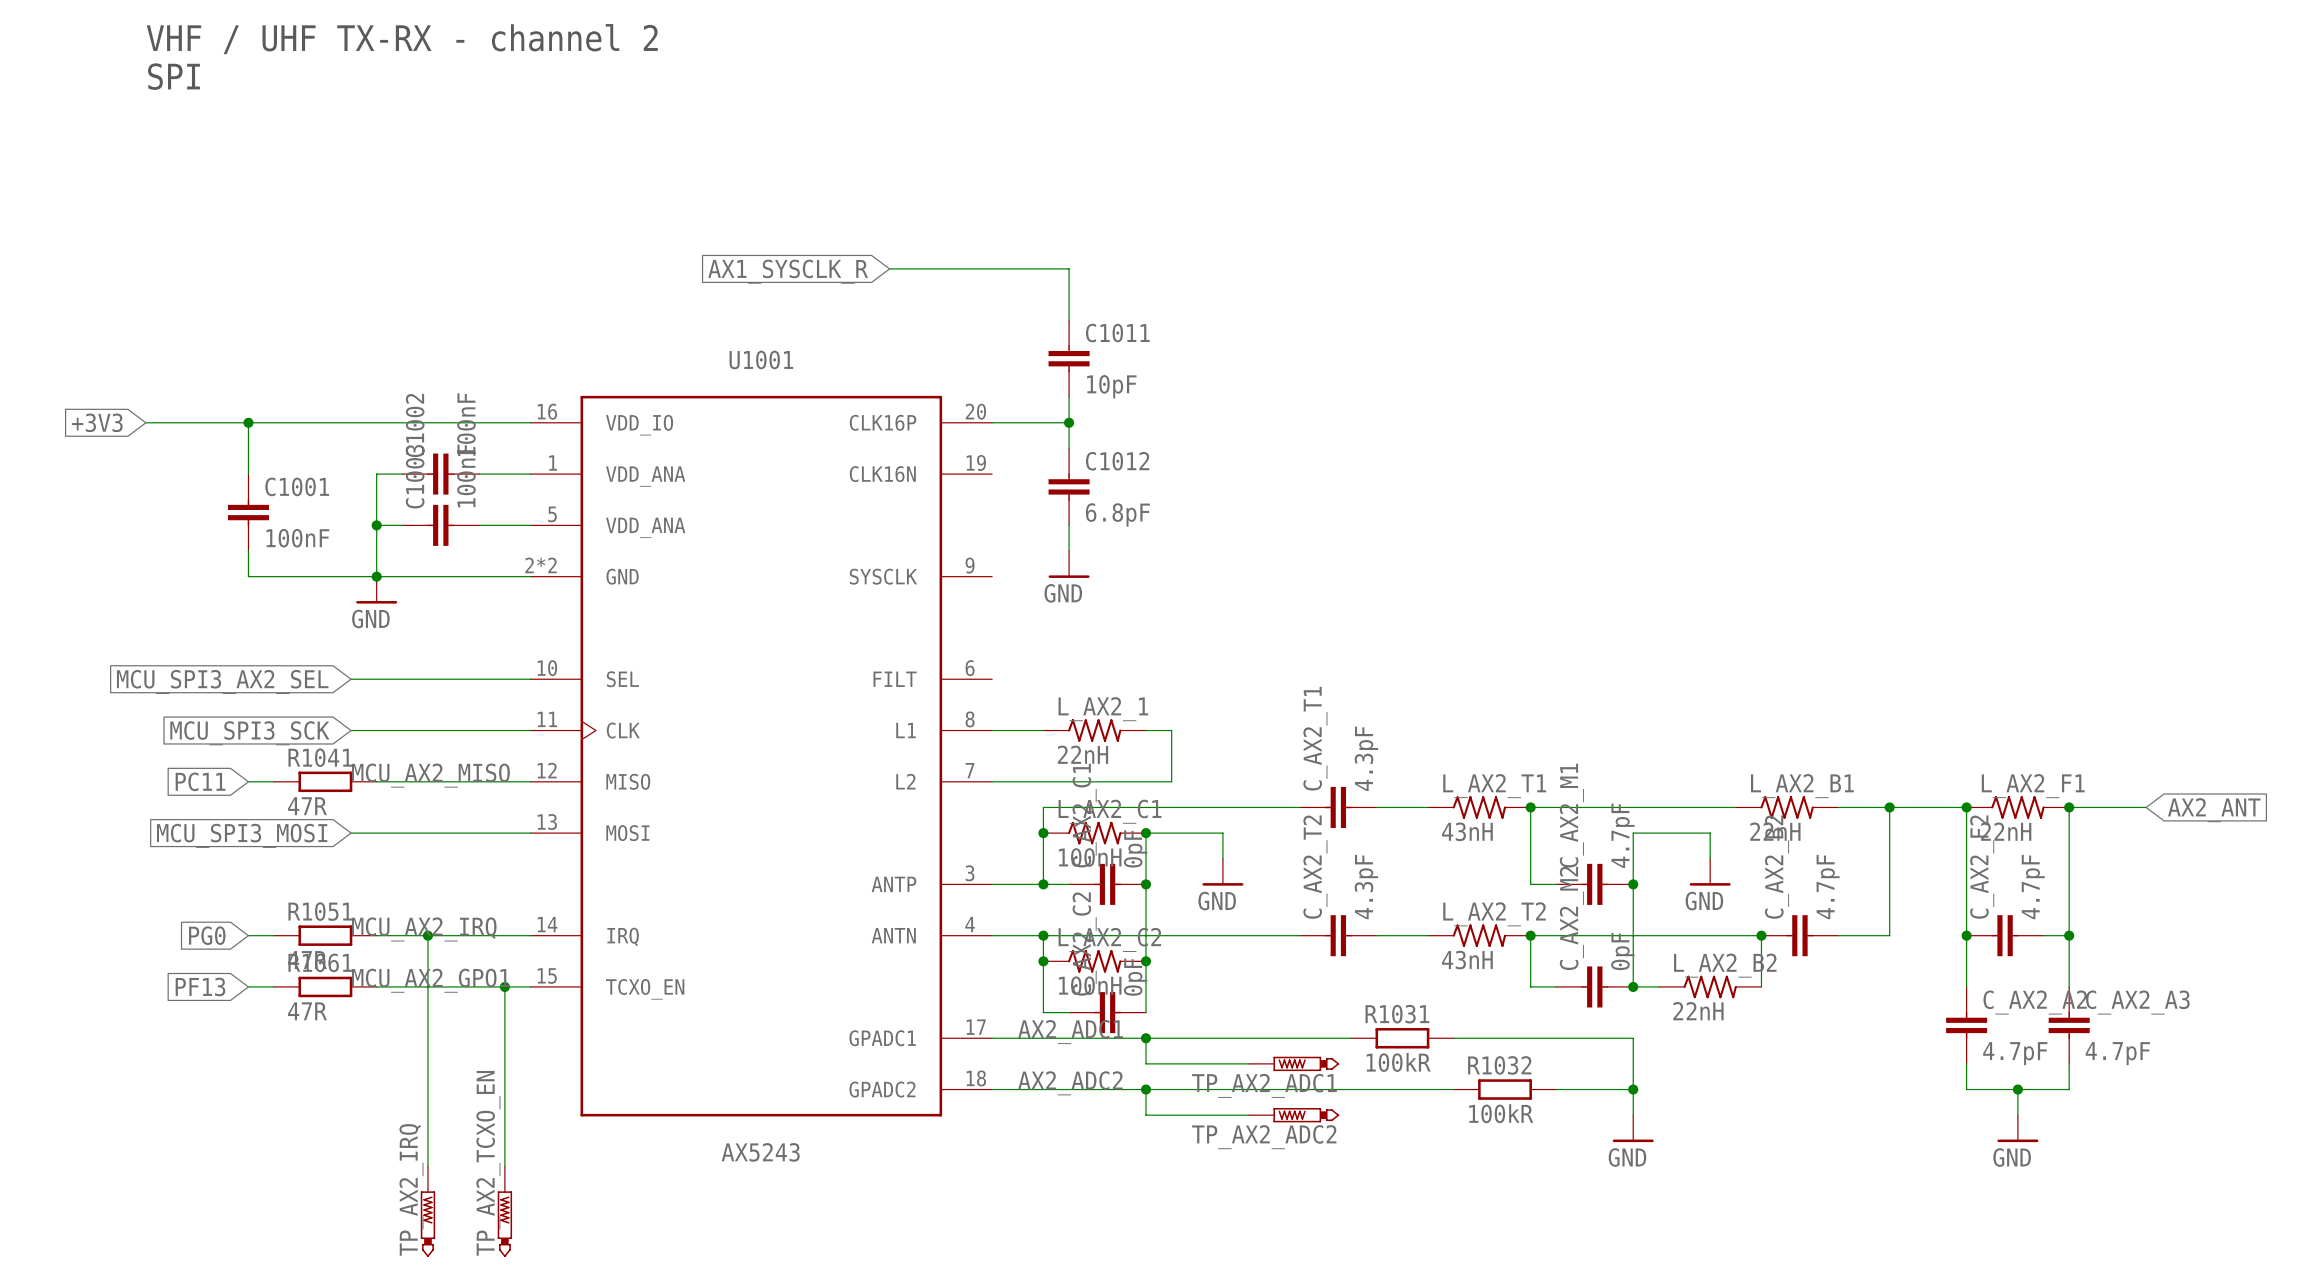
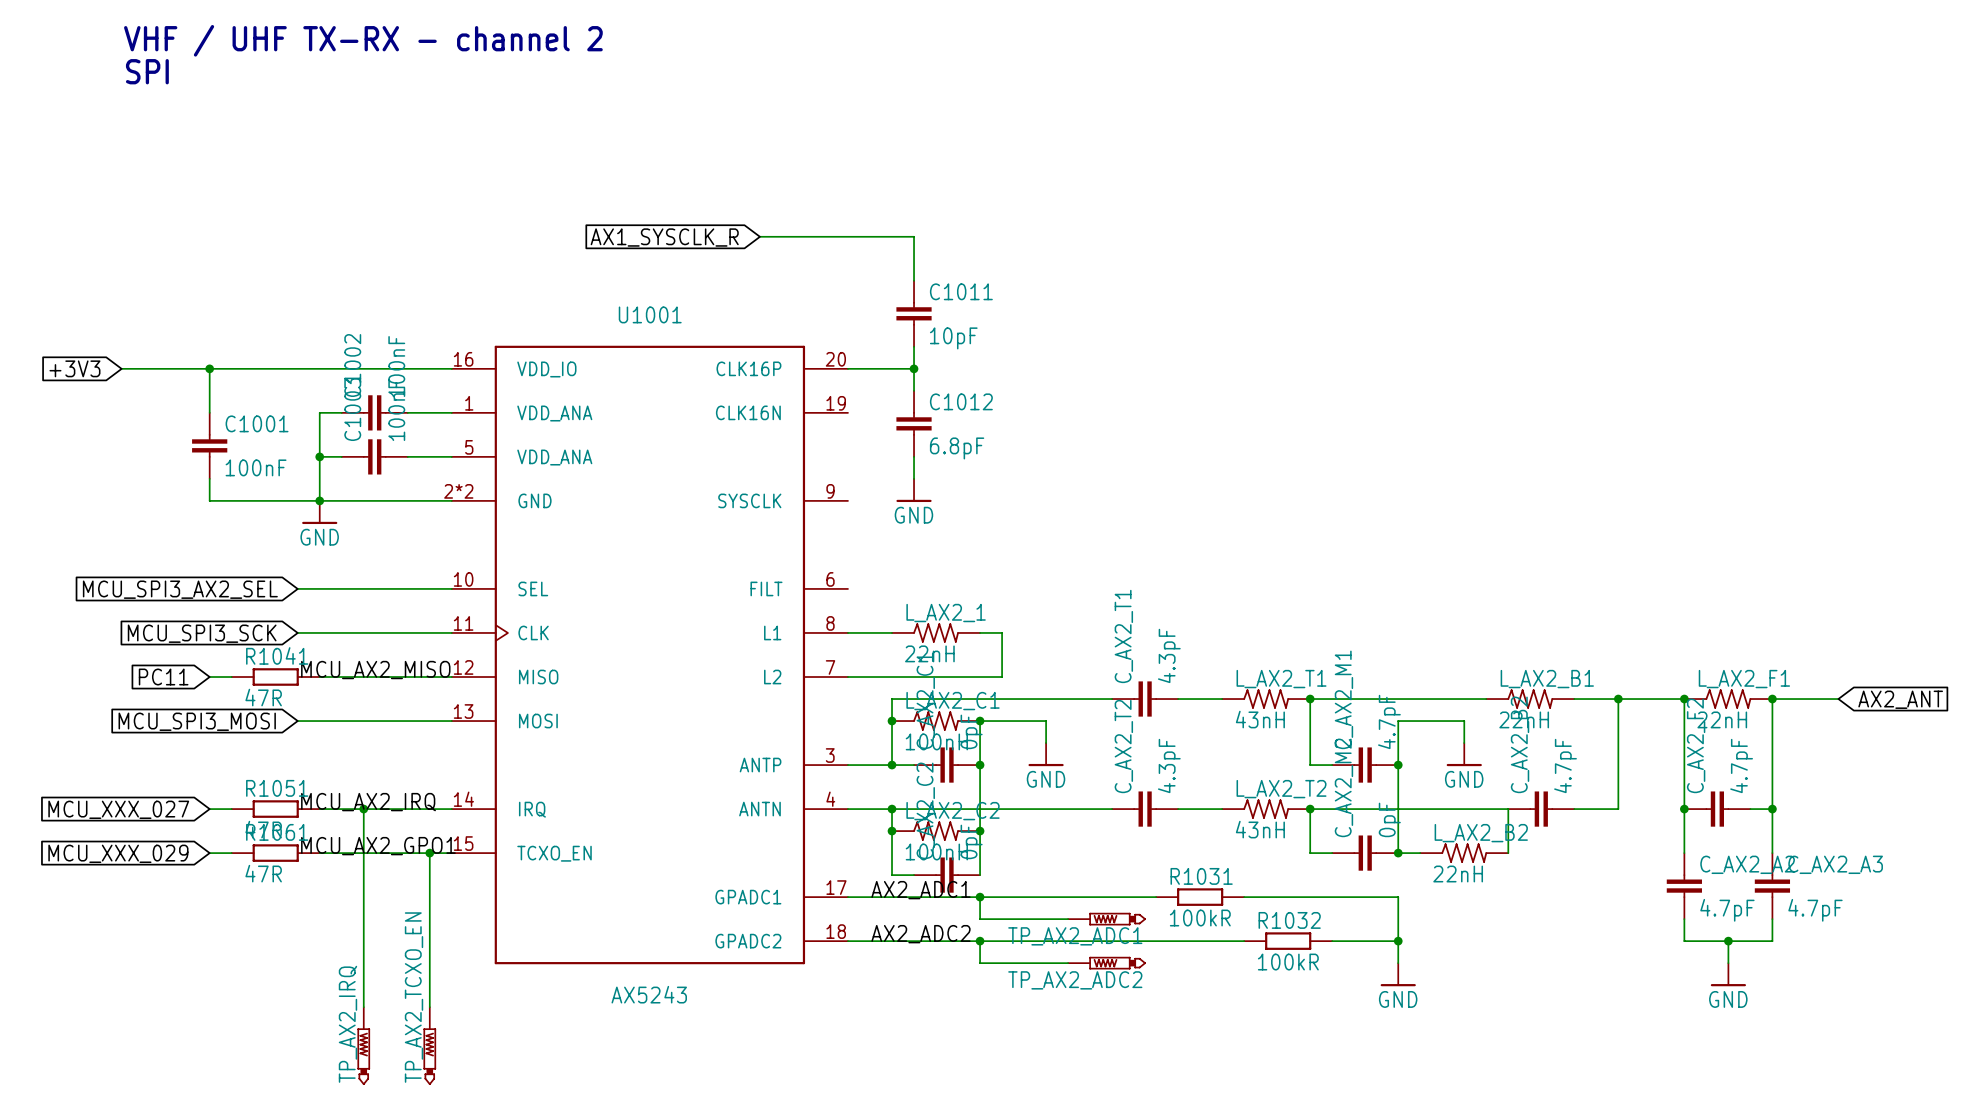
global label: PG0 (207, 935) -> MCU_XXX_027 (118, 809)
junction: (1761, 935) -> none
global label: PF13 (200, 986) -> MCU_XXX_029 (118, 853)

